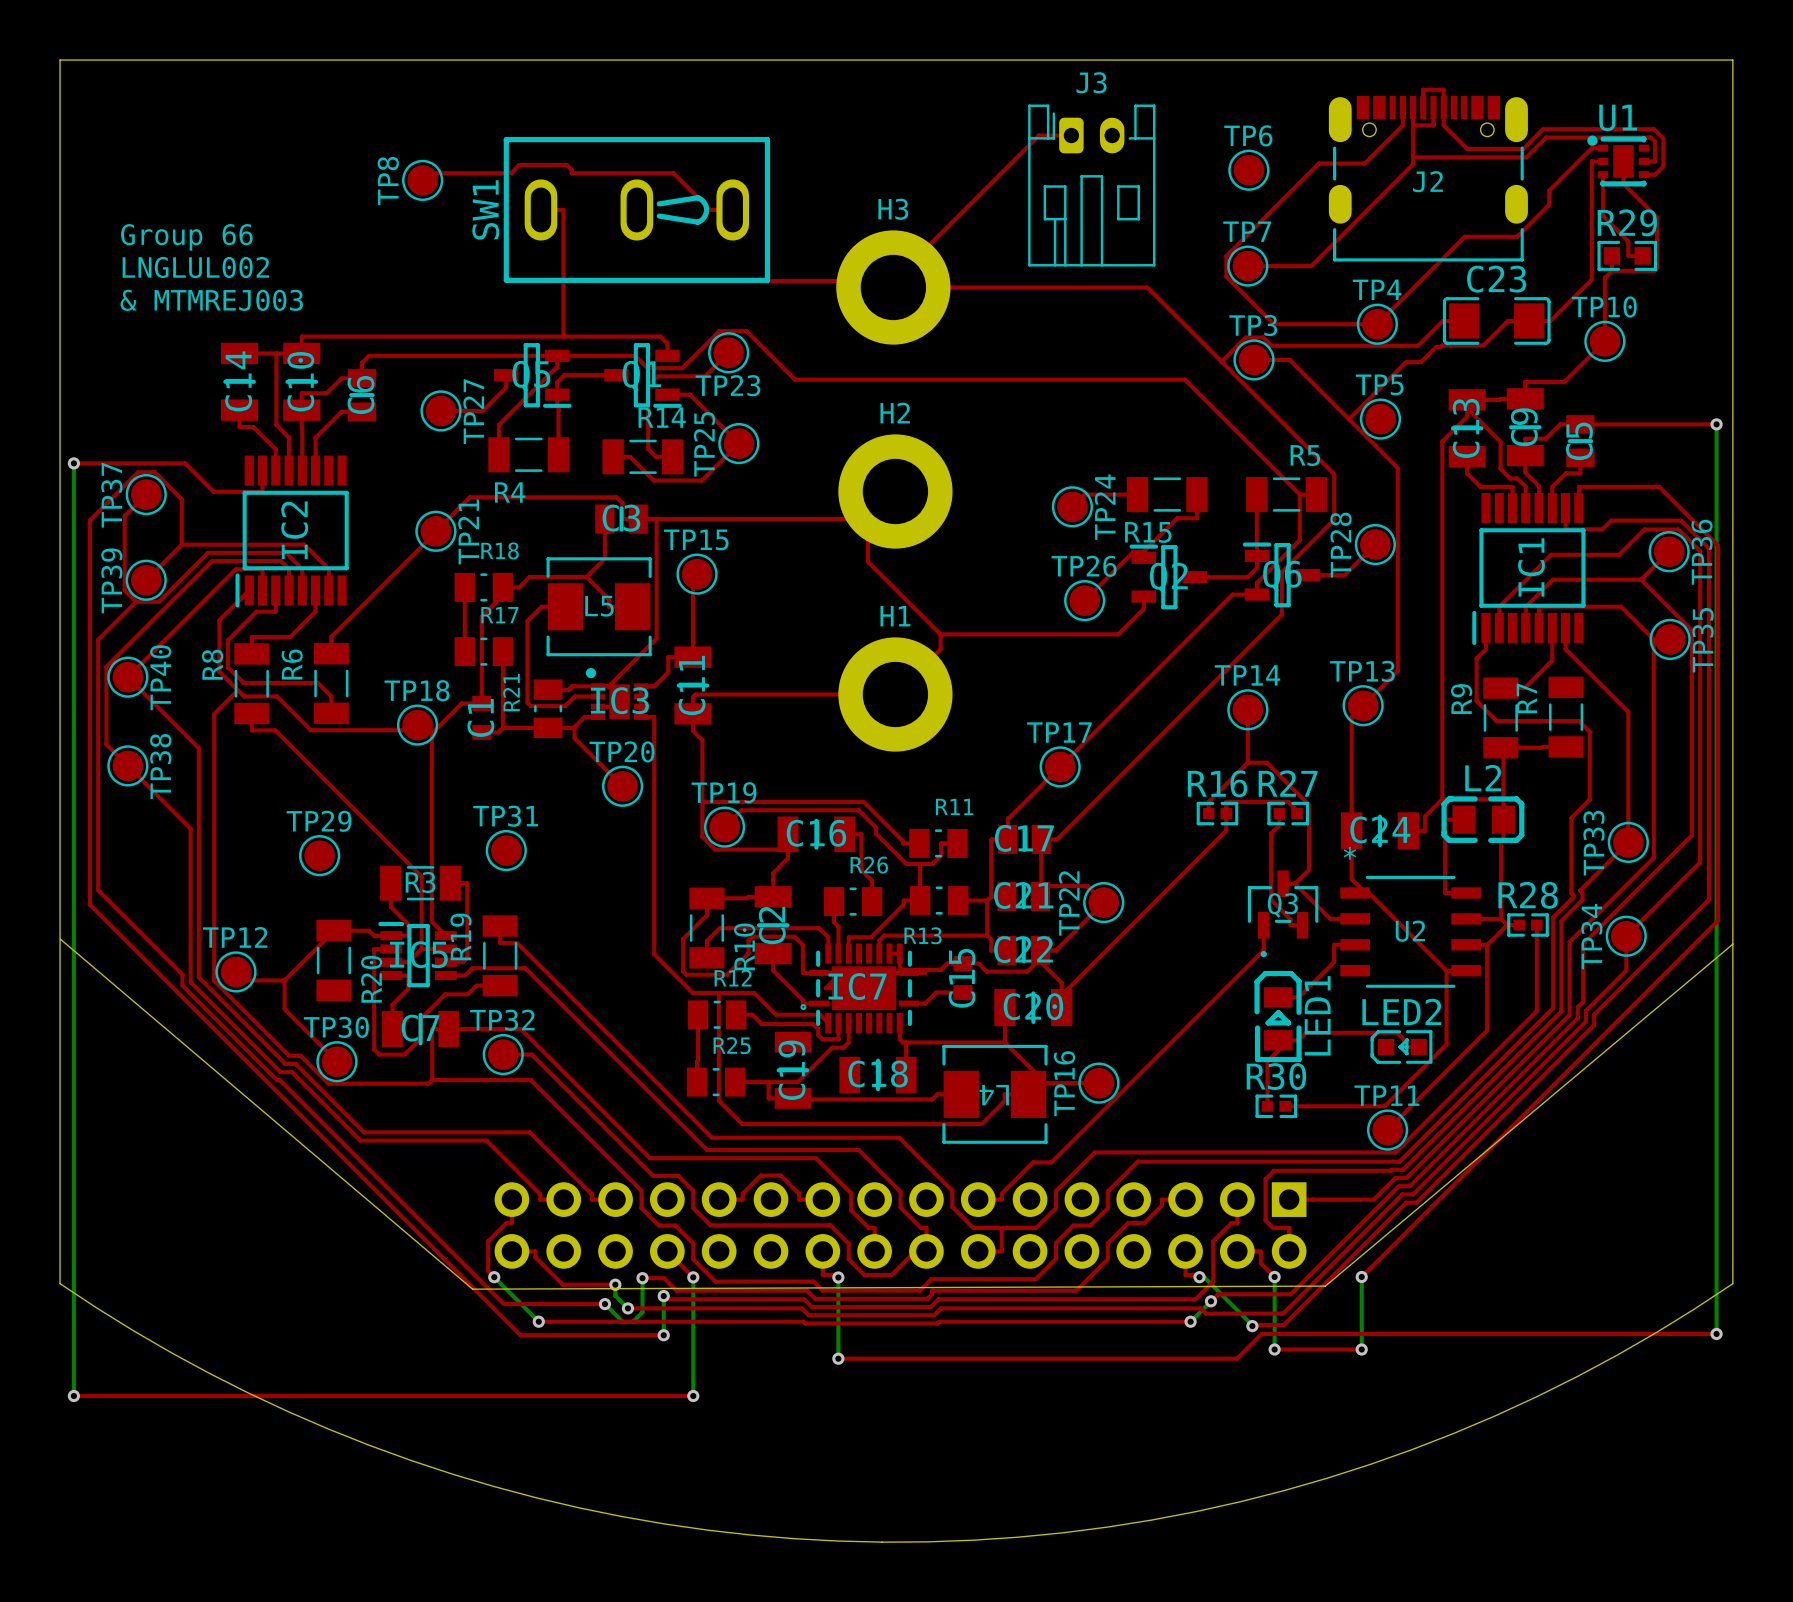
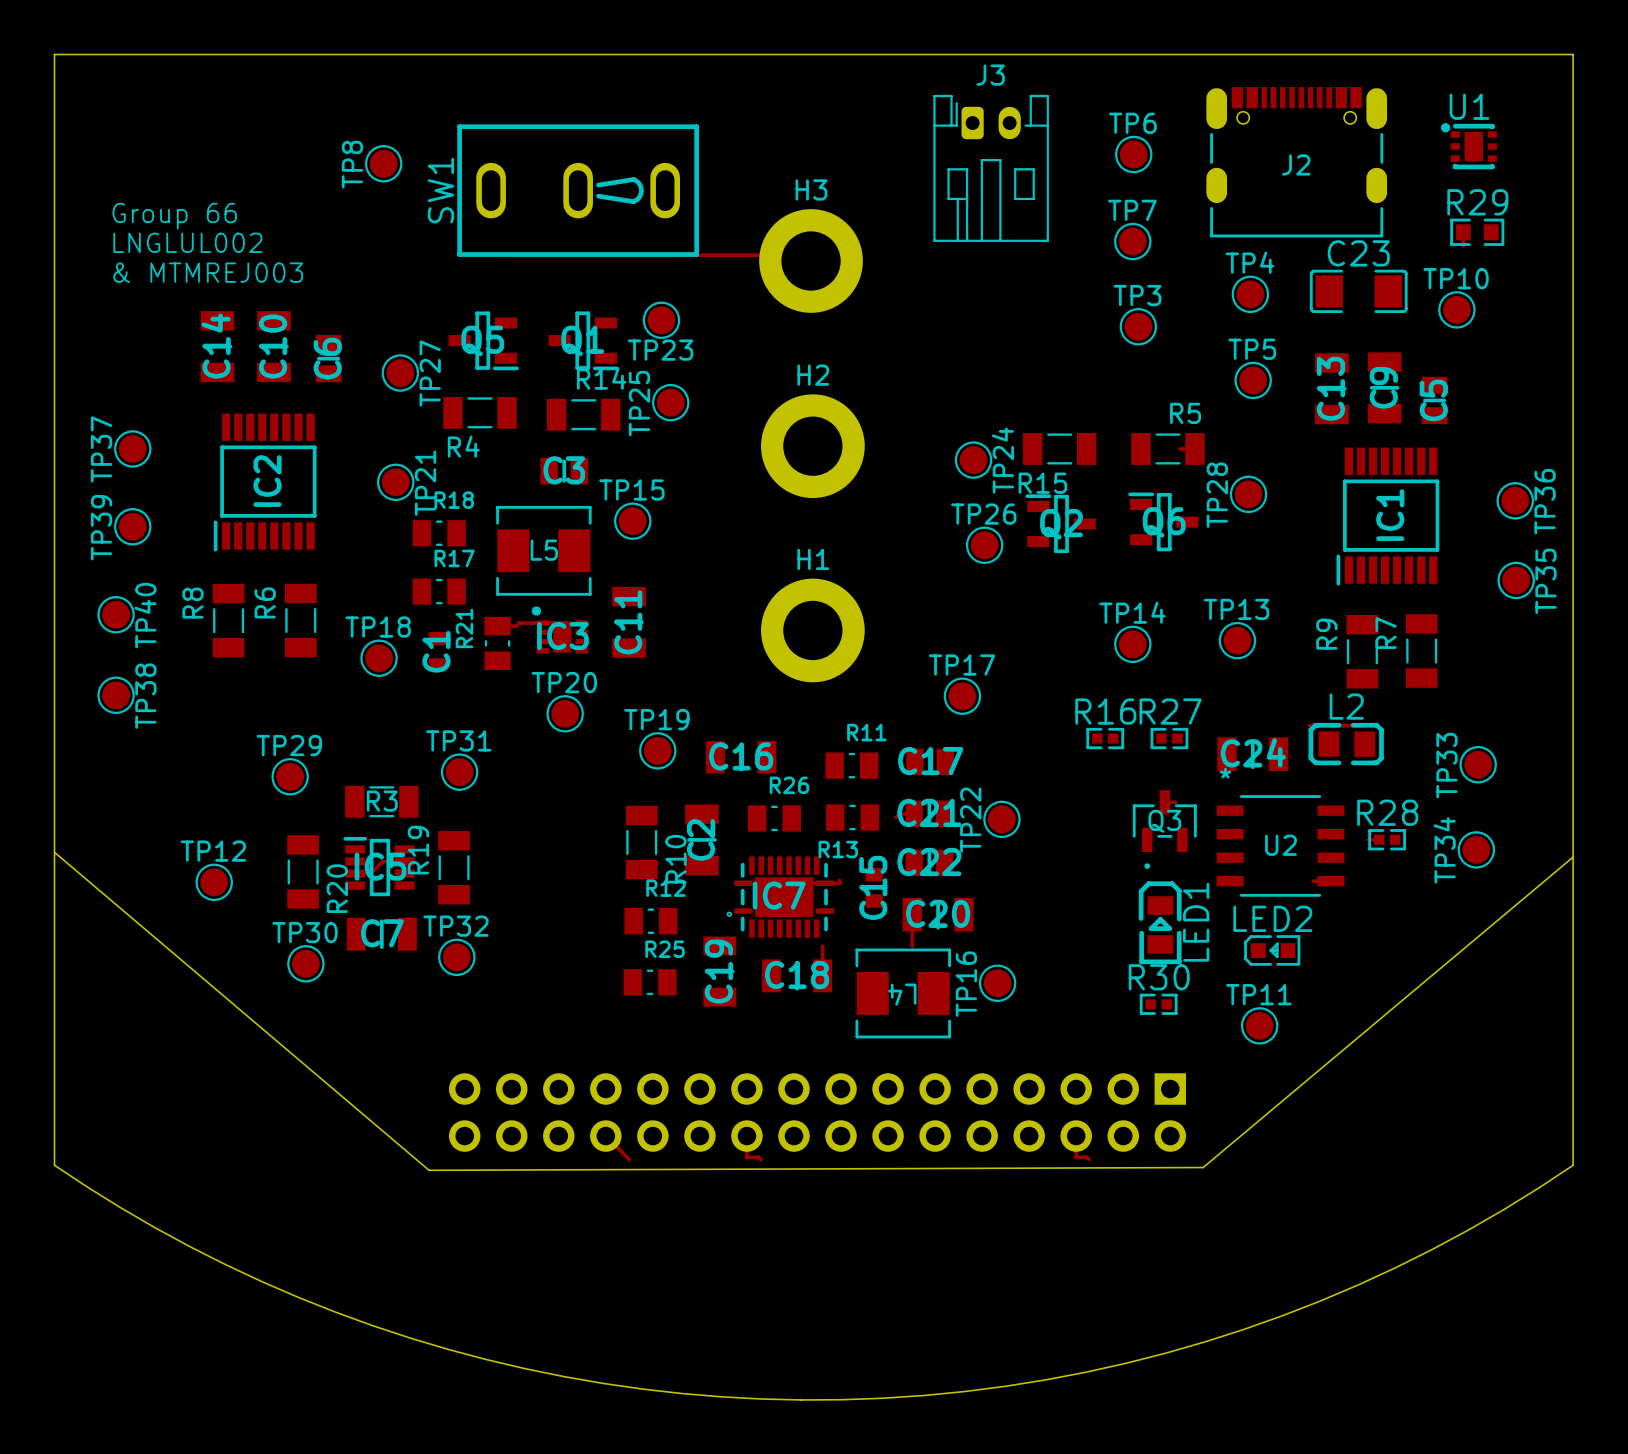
top track: (1402, 107) (1402, 125) (1364, 163) (1318, 163) (1226, 256) (1226, 276) (1273, 324) (1377, 324) (1464, 236) (1517, 236) (1549, 204) (1549, 190) (1591, 148) (1603, 148) -> none
top track: (1413, 107) (1413, 164) (1311, 266) (1247, 266) -> none
top track: (1423, 107) (1423, 89) (1443, 89) (1443, 125) (1467, 148) (1523, 148) (1542, 129) (1654, 129) (1663, 138) (1663, 166) (1655, 174) (1643, 174) -> none
top track: (1433, 107) (1433, 125) (1413, 125) -> none
top track: (1071, 135) (1038, 135) (893, 281) (893, 287) (1147, 287) (1334, 474) (1334, 519) (1281, 572) (1281, 614) (1057, 839) (1041, 839) (1041, 886) -> none
top track: (1413, 157) (1526, 157) (1546, 137) (1650, 137) (1655, 141) (1655, 161) (1643, 161) -> none
top track: (1603, 161) (1591, 161) (1591, 279) (1550, 320) (1507, 320) (1483, 345) (1442, 345) (1436, 347) (1421, 362) (1406, 362) (1348, 419) -> none
top track: (1623, 161) (1623, 183) (1657, 217) (1657, 268) (1654, 270) (1611, 270) (1604, 277) (1604, 341) (1564, 382) (1525, 382) (1525, 398) (1467, 399) (1467, 416) (1442, 441) (1442, 799) (1425, 816) (1425, 830) (1408, 830) -> none
top track: (1603, 174) (1603, 216) (1628, 241) (1628, 255) (1642, 255) -> none
top track: (422, 180) (429, 173) (511, 173) (519, 165) (566, 165) (571, 169) (571, 173) (673, 173) (710, 209) (732, 209) -> none
top track: (540, 209) (563, 209) (563, 336) -> none
top track: (1464, 320) (1442, 320) (1418, 345) (1271, 345) (1263, 337) (1245, 337) (1221, 361) -> none
top track: (728, 352) (705, 376) (657, 376) (648, 385) (648, 449) (655, 456) (672, 456) -> none
top track: (239, 353) (301, 353) (301, 336) (660, 336) (667, 343) (667, 355) -> none
top track: (276, 353) (276, 425) (289, 437) (289, 470) -> none
top track: (557, 355) (557, 368) (498, 424) (498, 454) -> none
top track: (1253, 359) (1289, 359) (1397, 468) (1397, 671) (1351, 717) (1351, 879) (1365, 892) -> none
top track: (506, 375) (506, 387) (482, 410) (441, 410) -> none
top track: (616, 375) (564, 375) (557, 382) (558, 454) -> none
top track: (667, 394) (689, 394) (738, 443) (701, 480) (653, 480) (630, 456) (613, 456) -> none
top track: (1467, 408) (1500, 441) (1500, 468) (1510, 478) (1517, 478) (1525, 486) (1525, 508) -> none
top track: (239, 410) (239, 427) (253, 427) (275, 449) (275, 470) -> none
top track: (361, 411) (341, 411) (315, 437) (315, 470) -> none
top track: (1716, 424) (1560, 424) (1545, 438) (1525, 438) (1525, 472) (1539, 486) (1539, 508) -> none
bottom track: (1716, 424) (1716, 1333) -> none
via: (1716, 424) -> none
top track: (1467, 456) (1467, 473) (1480, 486) (1512, 486) (1512, 508) -> none
top track: (1580, 457) (1580, 473) (1565, 473) (1552, 486) (1552, 508) -> none
top track: (73, 463) (185, 463) (213, 491) (262, 491) (262, 470) -> none
bottom track: (73, 463) (73, 1396) -> none
via: (73, 463) -> none
top track: (302, 470) (301, 393) (326, 393) (341, 378) (361, 378) (361, 362) (369, 355) (635, 355) (647, 368) (682, 368) (719, 331) (746, 331) (795, 379) (1184, 379) (1299, 494) (1299, 540) (1257, 582) (1257, 594) (1232, 594) (1007, 818) (1007, 839) (991, 840) (991, 896) -> none
top track: (146, 494) (124, 516) (124, 590) (136, 601) -> none
top track: (1137, 494) (1084, 494) (1072, 506) -> none
top track: (1197, 494) (1197, 518) (1177, 518) (1143, 551) -> none
top track: (1256, 494) (1256, 543) -> none
top track: (1565, 508) (1565, 529) (1602, 529) (1611, 520) (1681, 520) (1708, 548) (1708, 899) (1594, 1014) (1594, 1025) (1416, 1202) (1406, 1202) (1283, 1324) (1252, 1326) -> none
top track: (1578, 508) (1578, 486) (1659, 486) (1717, 545) (1717, 920) (1361, 1276) -> none
top track: (604, 519) (604, 558) (586, 577) -> none
top track: (656, 519) (656, 638) (608, 686) -> none
top track: (867, 519) (622, 519) (622, 503) (616, 497) (469, 497) (331, 636) (331, 653) -> none
top track: (867, 519) (867, 561) (940, 634) -> none
top track: (1257, 543) (1257, 568) (1247, 577) (1194, 577) -> none
top track: (181, 544) (146, 580) -> none
top track: (181, 544) (304, 544) (328, 569) (328, 590) -> none
top track: (181, 544) (181, 499) (154, 472) (138, 472) (89, 520) (89, 904) (520, 1335) (663, 1335) -> none
top track: (1375, 544) (1344, 575) (1308, 575) -> none
top track: (1143, 551) (1133, 551) (1084, 600) -> none
top track: (1669, 551) (1641, 579) -> none
top track: (697, 574) (692, 578) (692, 657) (668, 657) (668, 672) (654, 686) (640, 686) (640, 716) (654, 716) (654, 954) (692, 992) (754, 992) (775, 1014) (820, 1014) (828, 1022) -> none
top track: (586, 577) (608, 599) (608, 606) (632, 606) -> none
top track: (586, 577) (529, 577) (519, 587) (502, 587) -> none
top track: (1641, 579) (1691, 630) (1691, 835) (1583, 944) (1583, 1001) (1577, 1007) (1577, 1018) (1409, 1186) (1398, 1186) (1290, 1294) (1218, 1294) (1211, 1301) -> none
top track: (1641, 579) (1552, 579) (1525, 606) (1525, 627) -> none
top track: (464, 587) (464, 651) -> none
top track: (511, 587) (481, 616) (481, 703) (461, 703) (431, 733) -> none
top track: (249, 590) (219, 620) (219, 671) (244, 696) (277, 696) (310, 730) (412, 730) (417, 725) (423, 725) (431, 733) -> none
top track: (262, 590) (262, 569) (235, 569) (127, 677) (198, 748) (198, 977) (285, 1063) (295, 1063) (363, 1132) (529, 1132) (592, 1194) (592, 1199) (615, 1199) -> none
top track: (275, 590) (275, 611) (256, 611) (227, 640) (227, 667) (243, 682) (317, 682) (331, 696) (331, 713) -> none
top track: (289, 590) (289, 569) (280, 561) (212, 561) (106, 666) (106, 744) (190, 828) (190, 982) (280, 1072) (291, 1072) (360, 1140) (486, 1140) (540, 1194) (540, 1199) (563, 1199) -> none
top track: (302, 590) (302, 569) (285, 552) (207, 552) (158, 601) (136, 601) -> none
top track: (315, 590) (315, 611) (290, 637) (251, 637) (251, 653) -> none
top track: (1143, 596) (1143, 608) (1118, 634) (940, 634) -> none
top track: (136, 601) (98, 639) (98, 890) (182, 974) (182, 985) (503, 1304) (604, 1304) -> none
top track: (565, 606) (541, 606) (527, 620) (527, 702) (530, 706) (565, 706) (574, 696) (598, 696) -> none
top track: (1486, 627) (1486, 649) (1476, 658) (1476, 701) (1496, 721) (1579, 721) (1589, 731) (1589, 799) (1571, 817) (1571, 893) (1573, 897) (1553, 917) (1553, 1008) (1399, 1161) (1137, 1161) (1107, 1191) (1107, 1208) (1090, 1225) (1073, 1225) (1055, 1242) (1055, 1258) (1035, 1279) (931, 1279) (919, 1290) (822, 1290) (813, 1281) (715, 1281) (693, 1259) (693, 1243) (675, 1225) (658, 1225) (641, 1208) (641, 1190) (530, 1080) (432, 1080) -> none
top track: (1499, 627) (1499, 606) (1551, 554) (1619, 554) (1644, 529) (1678, 529) (1700, 551) (1700, 862) (1626, 936) (1626, 970) (1585, 1010) (1585, 1021) (1413, 1194) (1402, 1194) (1283, 1313) (1205, 1313) (1200, 1308) (940, 1308) (934, 1315) (808, 1315) (801, 1308) (627, 1308) -> none
top track: (1539, 627) (1539, 606) (1621, 606) (1653, 639) -> none
top track: (1552, 627) (1552, 660) (1524, 688) (1500, 688) -> none
top track: (1565, 627) (1565, 649) (1628, 711) (1628, 842) (1580, 890) (1582, 893) (1582, 899) (1561, 920) (1561, 1011) (1403, 1169) (1274, 1170) (1265, 1179) (1265, 1220) (1273, 1227) (1289, 1227) (1289, 1251) -> none
top track: (940, 634) (940, 649) (895, 694) (695, 694) (692, 697) (692, 730) (702, 740) (702, 836) (715, 849) (784, 849) (788, 846) -> none
top track: (1653, 639) (1653, 857) (1569, 942) (1569, 1014) (1406, 1178) (1395, 1178) (1373, 1199) (1289, 1199) -> none
top track: (502, 651) (502, 727) -> none
top track: (237, 690) (214, 714) (214, 980) (289, 1055) (300, 1055) (328, 1083) (428, 1083) (432, 1080) -> none
top track: (1247, 709) (1247, 762) -> none
top track: (251, 713) (251, 730) (275, 730) (421, 876) (421, 948) -> none
top track: (598, 716) (584, 716) (574, 727) (574, 738) (622, 786) -> none
top track: (502, 727) (498, 732) (481, 732) -> none
top track: (502, 727) (574, 727) -> none
top track: (431, 733) (431, 921) (445, 935) -> none
top track: (1566, 746) (1500, 747) -> none
top track: (1503, 747) (1501, 918) -> none
top track: (1247, 762) (1208, 801) (1208, 813) -> none
top track: (1247, 762) (1266, 762) (1308, 804) (1308, 869) (1295, 883) (1330, 918) (1355, 918) -> none
top track: (702, 801) (863, 801) (903, 843) (919, 843) -> none
top track: (1279, 813) (1279, 825) (1271, 833) (1271, 900) (1290, 919) (1290, 925) (1302, 925) -> none
top track: (1297, 813) (1297, 810) (1288, 801) (1226, 801) (1226, 830) (1061, 995) -> none
top track: (1464, 819) (1445, 820) (1445, 892) (1466, 892) -> none
top track: (724, 827) (741, 810) (858, 810) (876, 827) (876, 833) (906, 864) (932, 864) (941, 855) (941, 843) (957, 843) -> none
top track: (788, 834) (788, 858) (773, 873) (773, 896) (706, 898) (706, 915) (683, 938) (683, 971) (686, 974) (727, 974) (748, 953) (748, 940) (752, 936) (794, 936) (802, 945) (802, 972) (835, 972) (835, 978) (825, 988) (864, 988) -> none
top track: (844, 834) (861, 834) (861, 870) (872, 880) (872, 901) -> none
top track: (920, 864) (920, 900) (903, 900) (903, 904) (871, 937) (848, 937) (848, 953) -> none
top track: (390, 883) (390, 906) (408, 924) (408, 935) (374, 935) (369, 930) (333, 930) (284, 980) -> none
top track: (450, 883) (467, 883) (467, 957) (462, 962) (445, 962) -> none
top track: (1355, 892) (1368, 892) (1446, 970) (1446, 1044) (1384, 1106) (1285, 1106) -> none
top track: (1040, 896) (1040, 886) (1087, 886) (1103, 902) (1056, 950) (1040, 950) -> none
top track: (958, 900) (987, 900) (987, 935) -> none
top track: (834, 901) (834, 922) (838, 926) (838, 953) -> none
top track: (1466, 918) (1501, 918) -> none
top track: (1501, 918) (1507, 925) (1487, 944) (1466, 944) -> none
top track: (1263, 925) (1263, 950) (1051, 1162) (1033, 1162) (1001, 1193) (1001, 1199) (978, 1199) -> none
top track: (1536, 925) (1536, 1011) (1395, 1152) (1094, 1152) (1055, 1191) (1055, 1208) (1036, 1227) (973, 1227) (952, 1206) (952, 1190) (899, 1137) (711, 1137) (517, 942) (500, 942) (500, 926) -> none
top track: (987, 935) (884, 935) (879, 940) (879, 953) -> none
top track: (987, 935) (991, 939) (991, 950) (1007, 950) -> none
top track: (1355, 944) (1334, 944) (1334, 962) (1298, 997) (1278, 997) -> none
top track: (1487, 944) (1487, 1030) (1387, 1130) -> none
top track: (391, 948) (374, 948) (374, 1049) (379, 1054) (404, 1054) (420, 1038) (420, 1019) (445, 994) (467, 994) (476, 985) (500, 985) -> none
top track: (1048, 950) (1027, 971) (986, 971) (978, 963) (947, 963) (940, 969) (899, 969) (899, 953) (889, 953) -> none
top track: (773, 953) (773, 970) (802, 1000) (802, 1003) (819, 1003) -> none
top track: (828, 953) (828, 937) (819, 928) (719, 928) (706, 940) (706, 957) -> none
top track: (1038, 960) (1061, 982) (1061, 1007) -> none
top track: (235, 971) (244, 980) (284, 980) -> none
top track: (391, 975) (408, 975) (408, 988) (392, 1004) (392, 1029) -> none
top track: (445, 975) (465, 975) (472, 968) (525, 968) (707, 1150) (858, 1150) (900, 1191) (900, 1207) (920, 1227) (926, 1227) (926, 1251) -> none
top track: (284, 980) (284, 1009) (336, 1061) -> none
top track: (718, 992) (718, 1100) (742, 1124) (981, 1124) (1004, 1101) (1004, 1094) (1028, 1094) (1028, 1091) (1036, 1083) -> none
top track: (962, 992) (936, 992) (925, 1003) (908, 1003) -> none
top track: (698, 1014) (697, 1082) -> none
top track: (736, 1014) (752, 1014) (761, 1024) (813, 1024) (818, 1028) (818, 1035) (822, 1039) (838, 1039) (838, 1022) -> none
top track: (848, 1022) (848, 1042) (843, 1047) (832, 1047) (797, 1082) (735, 1082) -> none
top track: (899, 1022) (899, 1039) (902, 1042) (1004, 1042) (1036, 1074) (1036, 1083) -> none
top track: (1278, 1040) (1298, 1040) (1306, 1032) (1397, 1032) (1404, 1039) (1404, 1047) (1418, 1047) -> none
top track: (1288, 1040) (1267, 1061) (1267, 1106) -> none
top track: (503, 1054) (531, 1054) (653, 1175) (678, 1175) (693, 1190) (693, 1208) (710, 1225) (830, 1225) (848, 1243) (848, 1259) (864, 1275) (891, 1275) (926, 1240) -> none
top track: (432, 1080) (432, 1029) (520, 1029) (649, 1158) (816, 1158) (851, 1193) (851, 1210) (868, 1227) (874, 1227) (874, 1251) -> none
top track: (768, 1082) (768, 1098) (792, 1098) -> none
top track: (1036, 1083) (1098, 1083) -> none
top track: (961, 1094) (937, 1094) (932, 1099) (786, 1098) -> none
top track: (511, 1199) (511, 1223) (506, 1223) (488, 1241) (488, 1271) (494, 1277) -> none
top track: (719, 1199) (742, 1199) (742, 1193) (760, 1175) (780, 1175) (799, 1194) (799, 1199) (822, 1199) -> none
top track: (1185, 1199) (1162, 1199) (1162, 1205) (1144, 1223) (1128, 1223) (1107, 1243) (1107, 1259) (1076, 1290) (932, 1290) (932, 1294) (927, 1298) (815, 1298) (807, 1290) (676, 1290) (664, 1278) (642, 1278) -> none
top track: (1237, 1199) (1237, 1223) (1231, 1223) (1213, 1241) (1213, 1281) (1195, 1299) (938, 1299) (930, 1307) (811, 1307) (804, 1299) (666, 1299) (663, 1296) -> none
top track: (1001, 1227) (1001, 1251) (978, 1251) -> none
top track: (511, 1251) (535, 1251) (535, 1257) (562, 1284) (615, 1284) -> none
top track: (1237, 1251) (1260, 1251) (1260, 1263) (1274, 1276) -> none
bottom track: (1274, 1276) (1274, 1349) -> none
via: (1274, 1276) -> none
bottom track: (1361, 1276) (1361, 1349) -> none
via: (1361, 1276) -> none
bottom track: (494, 1277) (538, 1321) -> none
via: (494, 1277) -> none
bottom track: (693, 1277) (693, 1396) -> none
via: (693, 1277) -> none
bottom track: (838, 1277) (838, 1358) -> none
via: (838, 1277) -> none
bottom track: (1199, 1277) (1204, 1277) (1252, 1326) -> none
via: (1199, 1277) -> none
bottom track: (642, 1278) (642, 1312) (632, 1321) (622, 1321) (604, 1304) -> none
via: (642, 1278) -> none
bottom track: (615, 1284) (615, 1295) (627, 1308) -> none
via: (615, 1284) -> none
bottom track: (663, 1296) (663, 1335) -> none
via: (663, 1296) -> none
bottom track: (1211, 1301) (1190, 1321) -> none
via: (1211, 1301) -> none
via: (604, 1304) -> none
via: (627, 1308) -> none
top track: (538, 1321) (803, 1321) (805, 1323) (1190, 1321) -> none
via: (538, 1321) -> none
via: (1190, 1321) -> none
via: (1252, 1326) -> none
top track: (1716, 1333) (1261, 1333) (1237, 1358) (838, 1358) -> none
via: (1716, 1333) -> none
via: (663, 1335) -> none
top track: (1274, 1349) (1361, 1349) -> none
via: (1274, 1349) -> none
via: (1361, 1349) -> none
via: (838, 1358) -> none
top track: (73, 1396) (693, 1396) -> none
via: (73, 1396) -> none
via: (693, 1396) -> none

